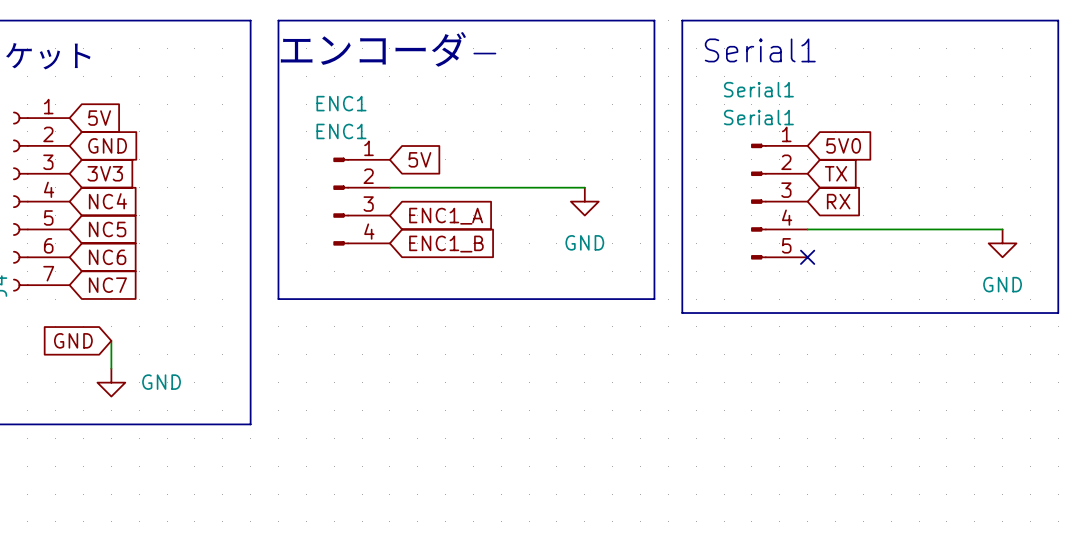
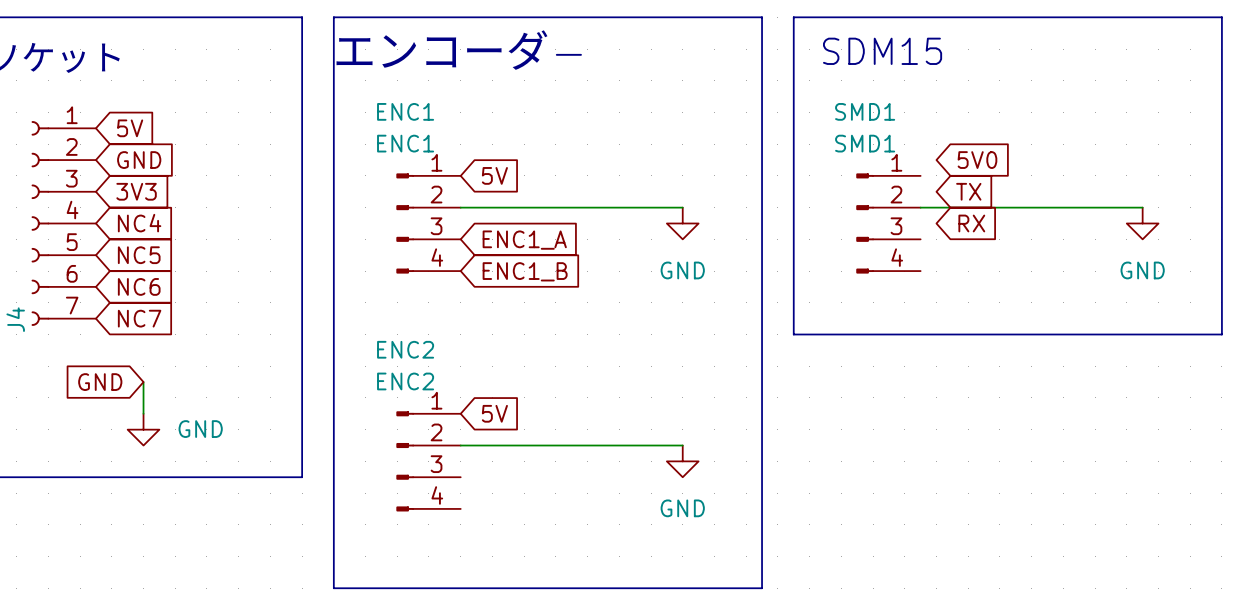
text: Serial1 (760, 50) -> SDM15 (882, 51)
SMD1: none -> SMD1 (888, 223)
Serial1: Serial1 (779, 201) -> none
wire: (807, 229) (1002, 229) -> (920, 207) (1142, 207)
power symbol position: GND (1002, 243) -> GND (1142, 223)
no-connect mark: (807, 257) -> none
line: (278, 299) (654, 299) -> (333, 334) (333, 588) (762, 588) (762, 334)
line: (682, 299) (682, 313) (1058, 313) (1058, 299) -> (793, 334) (1221, 334)
global label: none -> 5V (494, 413)
wire: none -> (460, 445) (682, 445)
ENC2: none -> ENC2 (428, 461)
power symbol: none -> GND (682, 461)

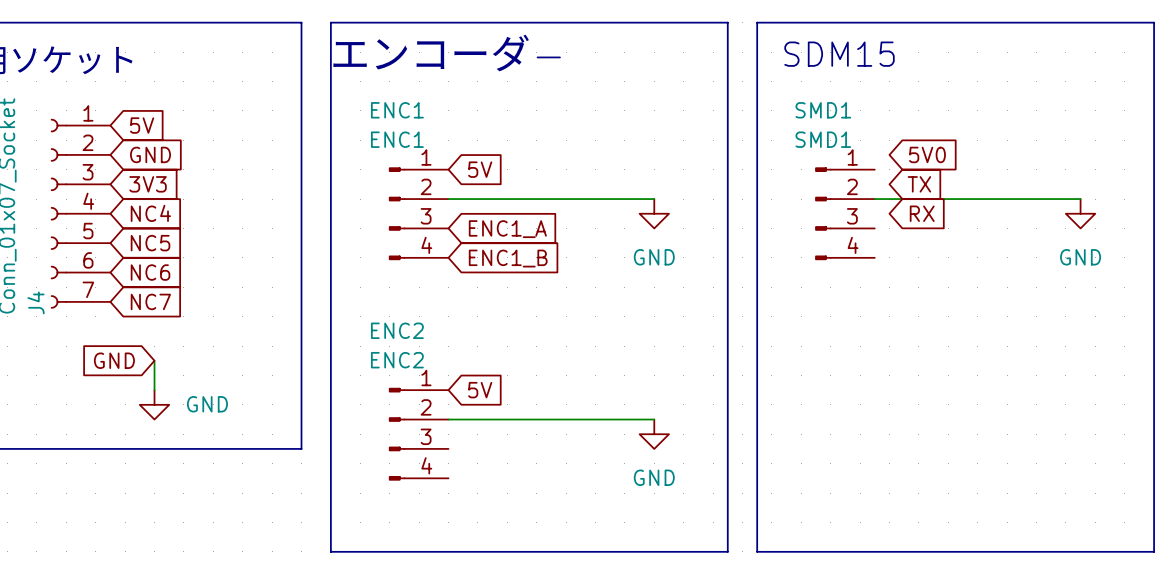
line: (793, 334) (1221, 334) -> (757, 316) (757, 551) (1154, 551) (1154, 316)

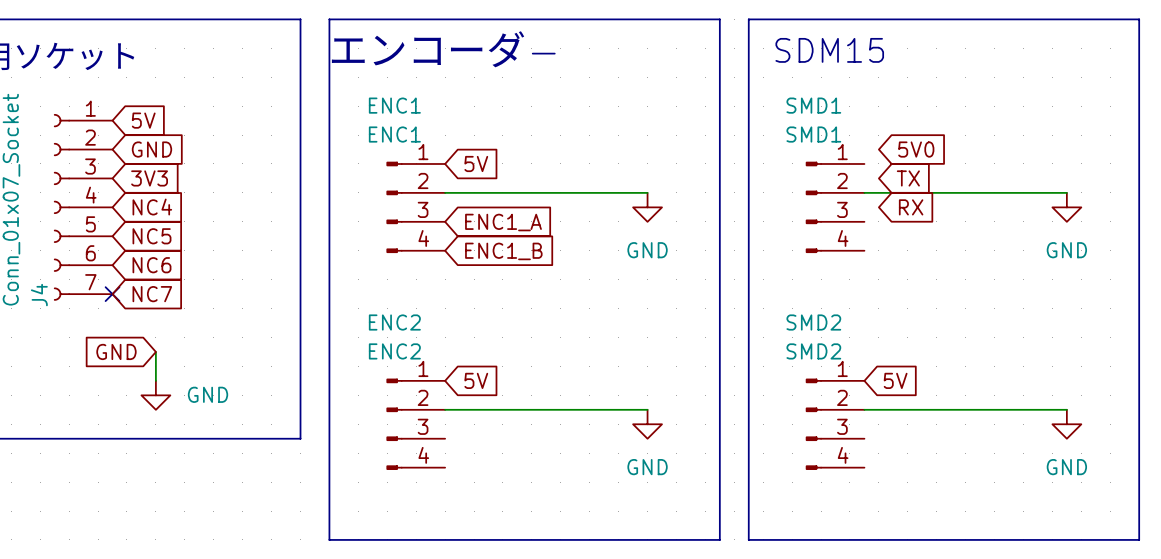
no-connect mark: none -> (112, 294)
global label: none -> 5V (895, 380)
wire: none -> (864, 409) (1066, 409)
SMD2: none -> SMD2 (835, 424)
power symbol: none -> GND (1066, 424)

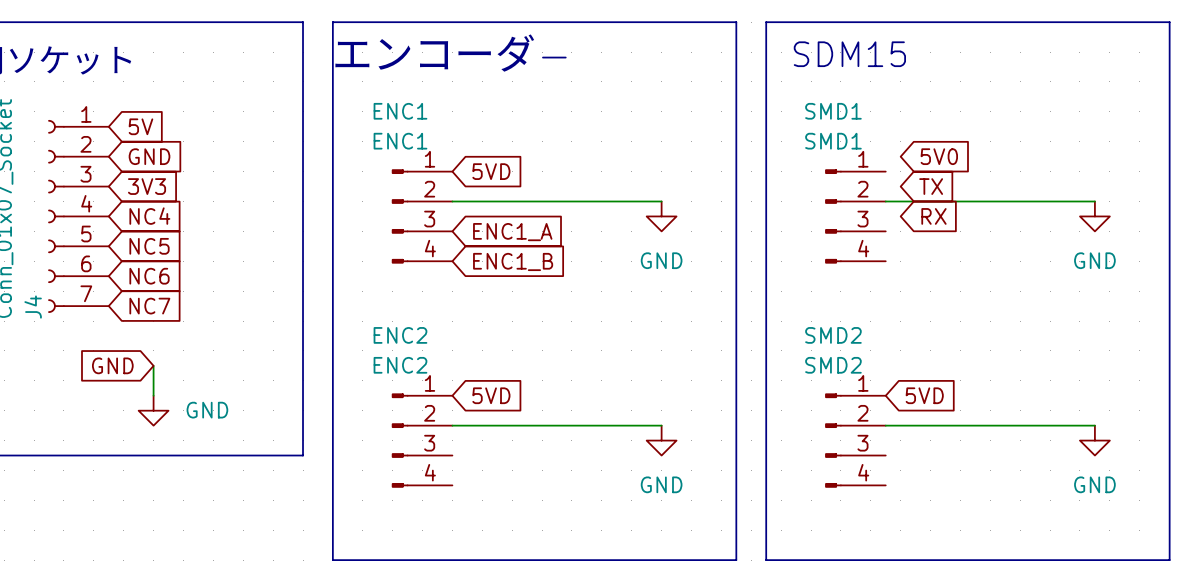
global label: 5V (476, 163) -> 5VD (491, 171)
no-connect mark: (112, 294) -> none
global label: 5V (476, 380) -> 5VD (491, 395)
global label: 5V (895, 380) -> 5VD (924, 395)

